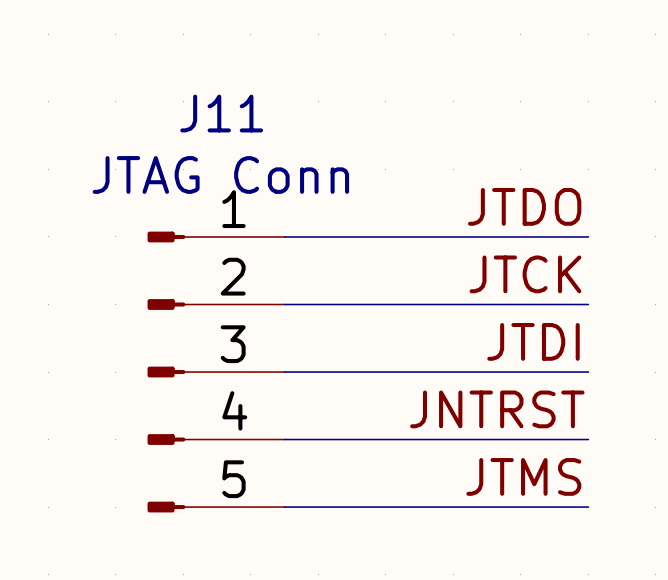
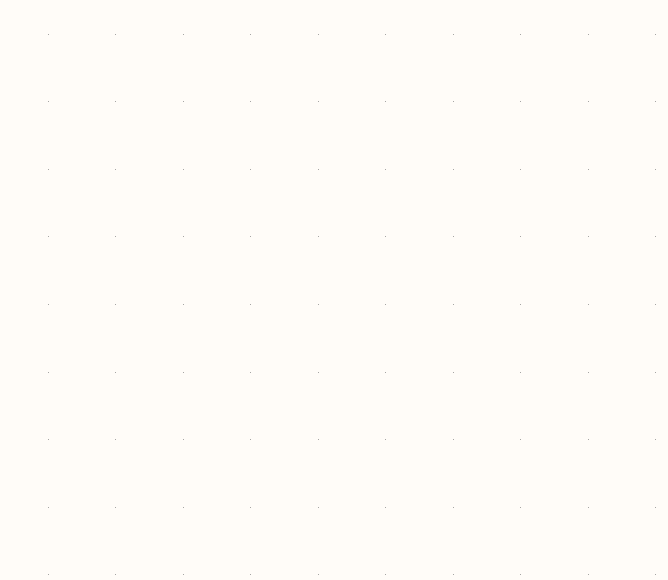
label: JTDO (524, 206) -> none
wire: (284, 236) (588, 236) -> none
label: JTCK (525, 274) -> none
wire: (284, 304) (588, 304) -> none
label: JTDI (533, 341) -> none
J11: JTAG Conn (216, 372) -> none
wire: (284, 372) (588, 372) -> none
label: JNTRST (497, 409) -> none
wire: (284, 439) (588, 439) -> none
label: JTMS (523, 476) -> none
wire: (284, 507) (588, 507) -> none

